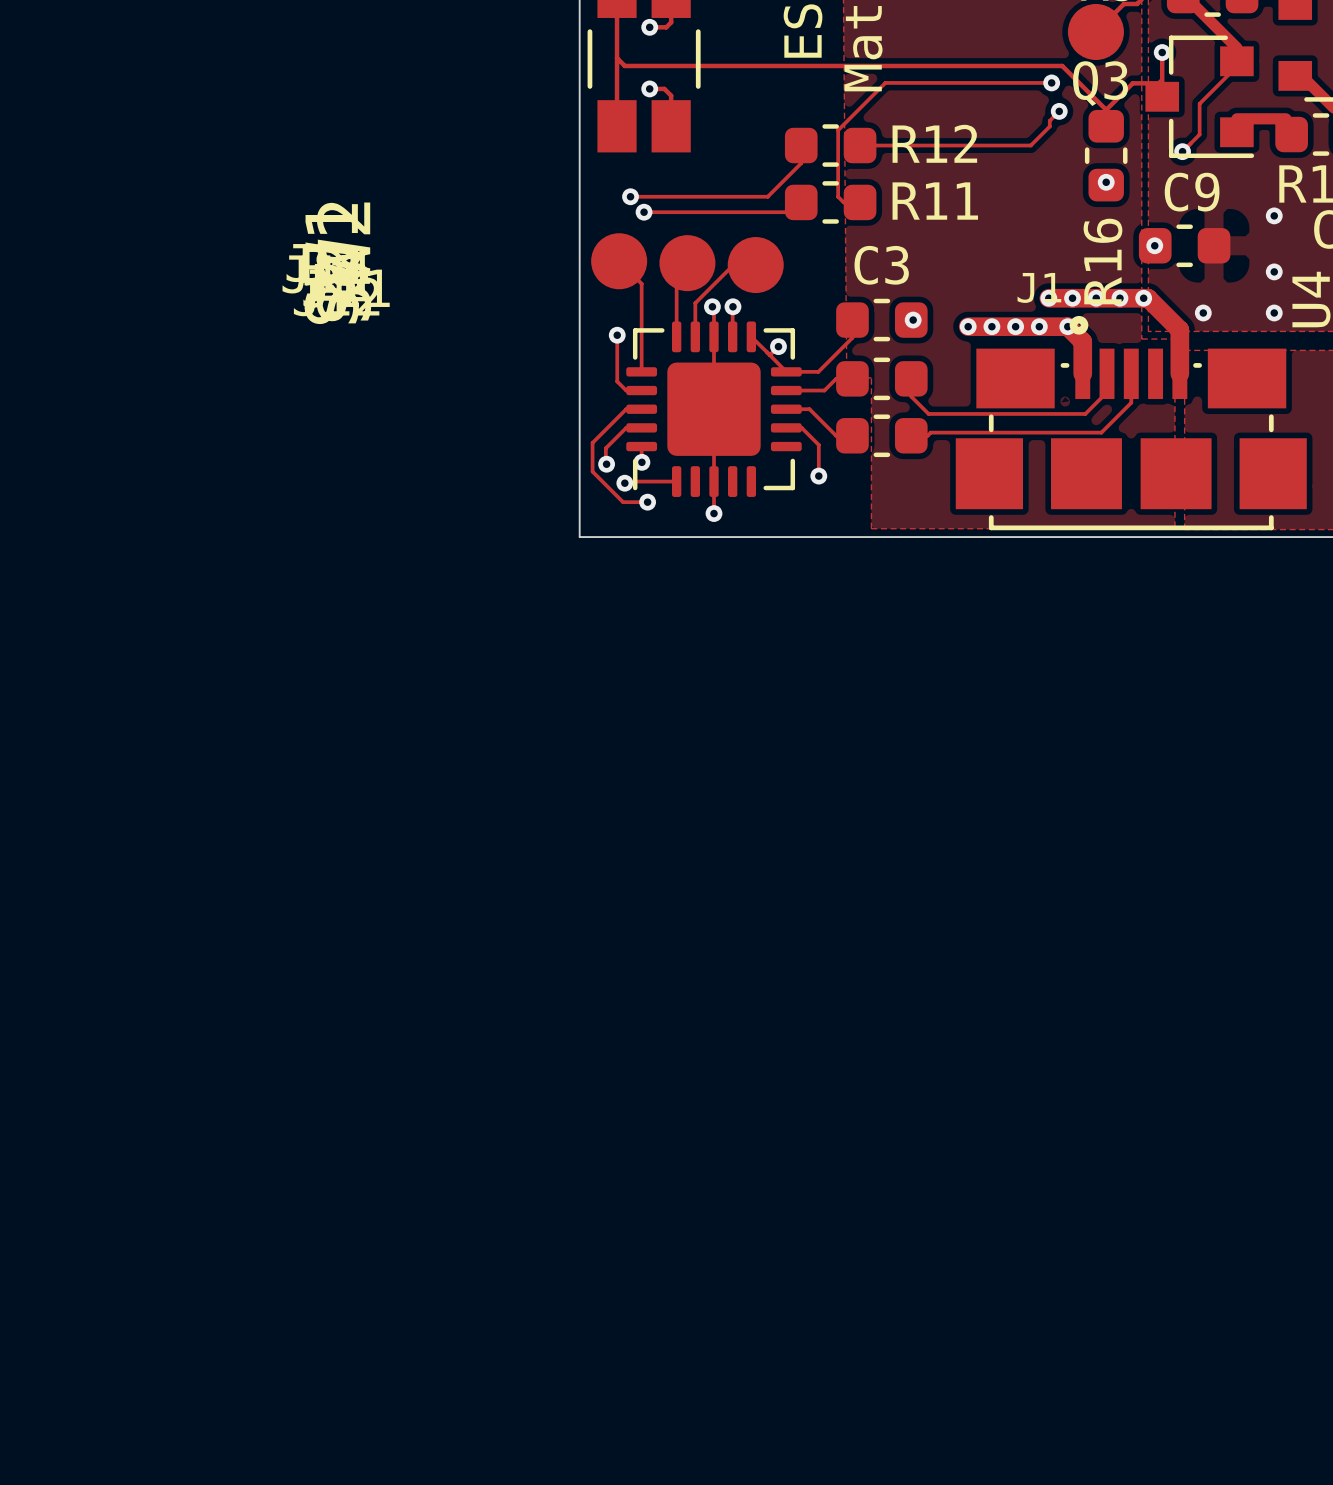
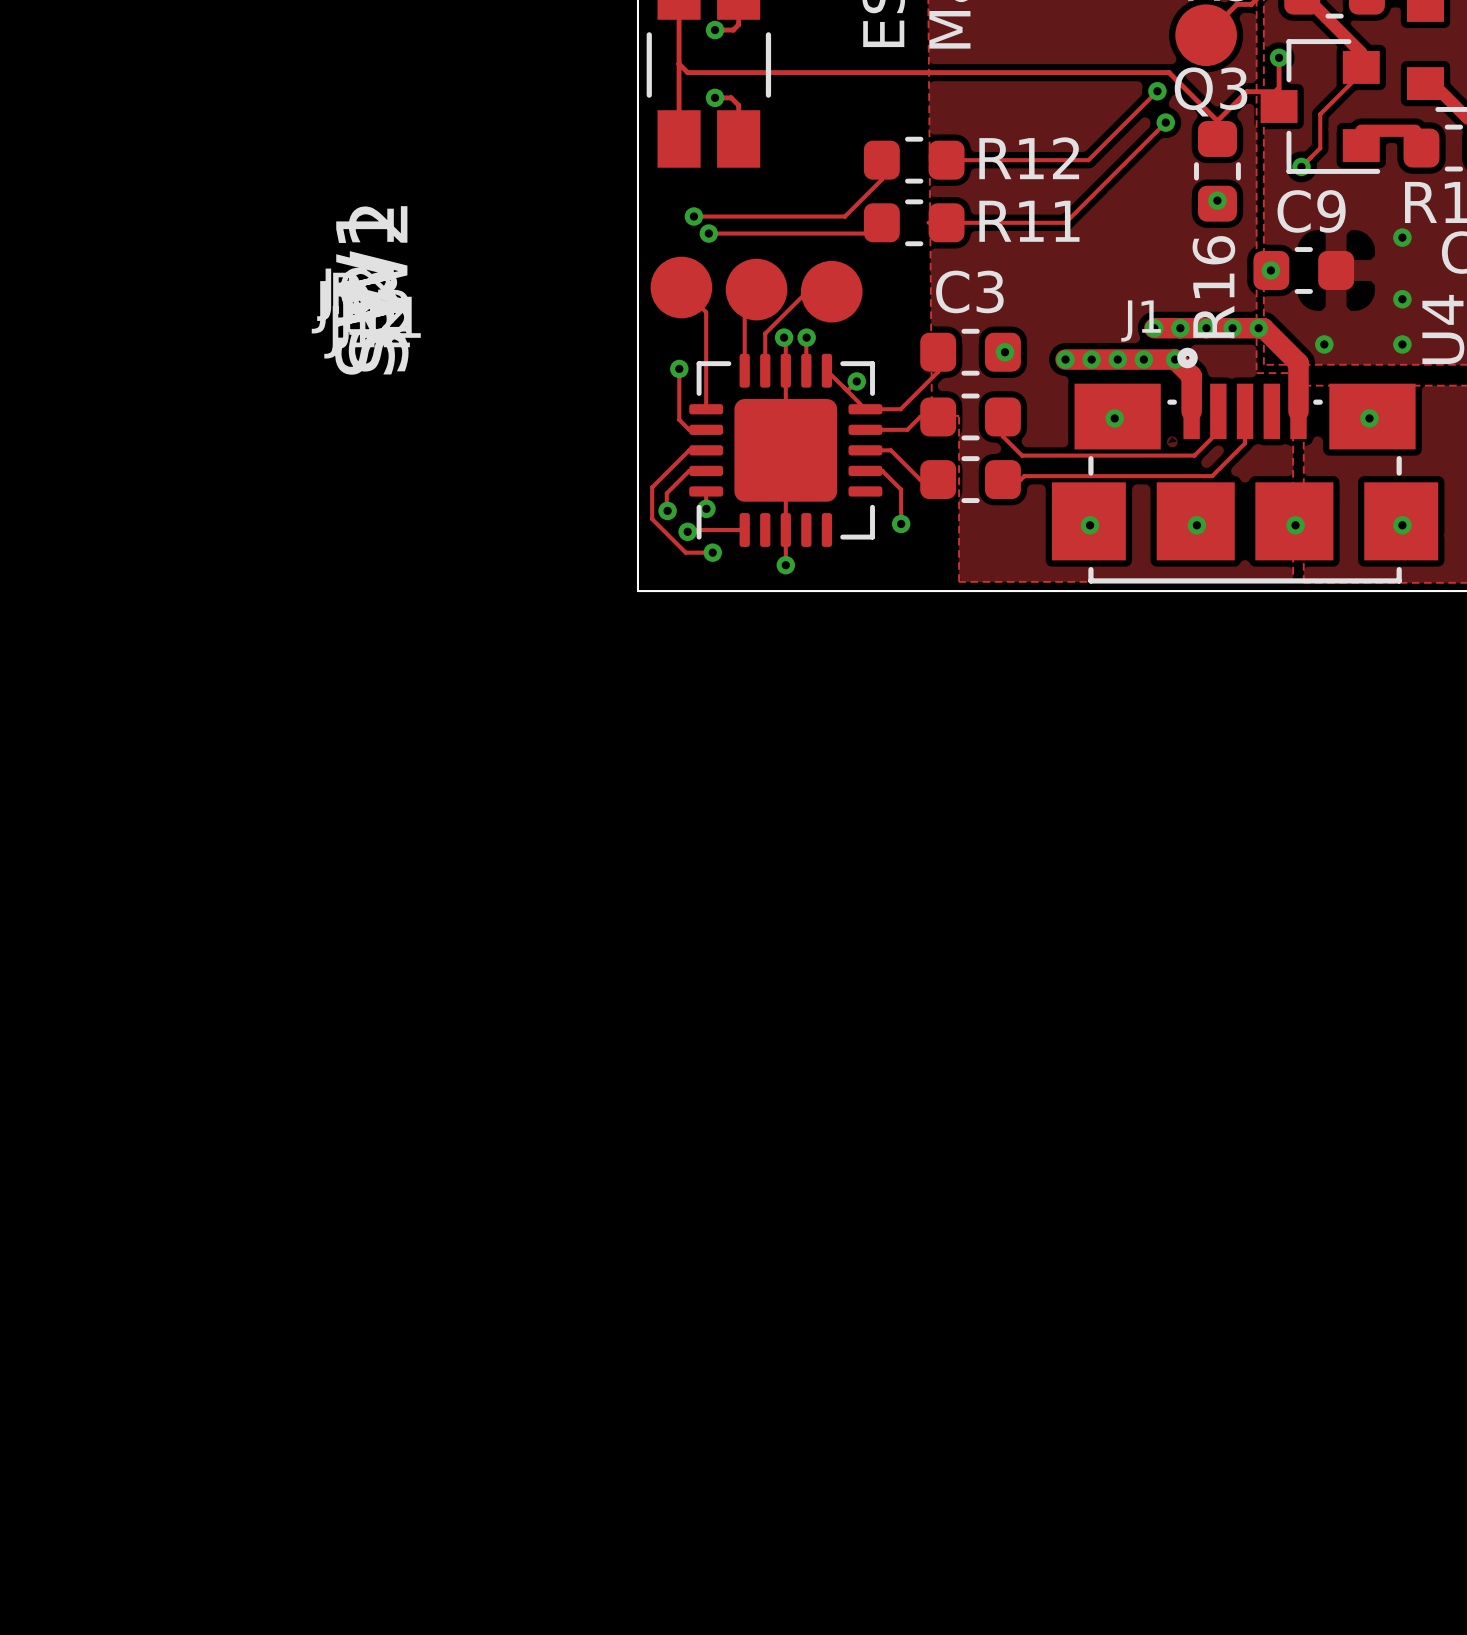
track: (1051, 82) (885, 82) (838, 130) (838, 196) (843, 202) -> none
track: (1049, 120) (1049, 126) (1030, 145) (989, 145) -> (1157, 91) (1088, 160)
track: none -> (1155, 133) (1065, 222) (946, 222)
via: none -> (1114, 418)
via: none -> (1369, 418)
via: none -> (1090, 525)
via: none -> (1196, 525)
via: none -> (1295, 525)
via: none -> (1402, 525)

